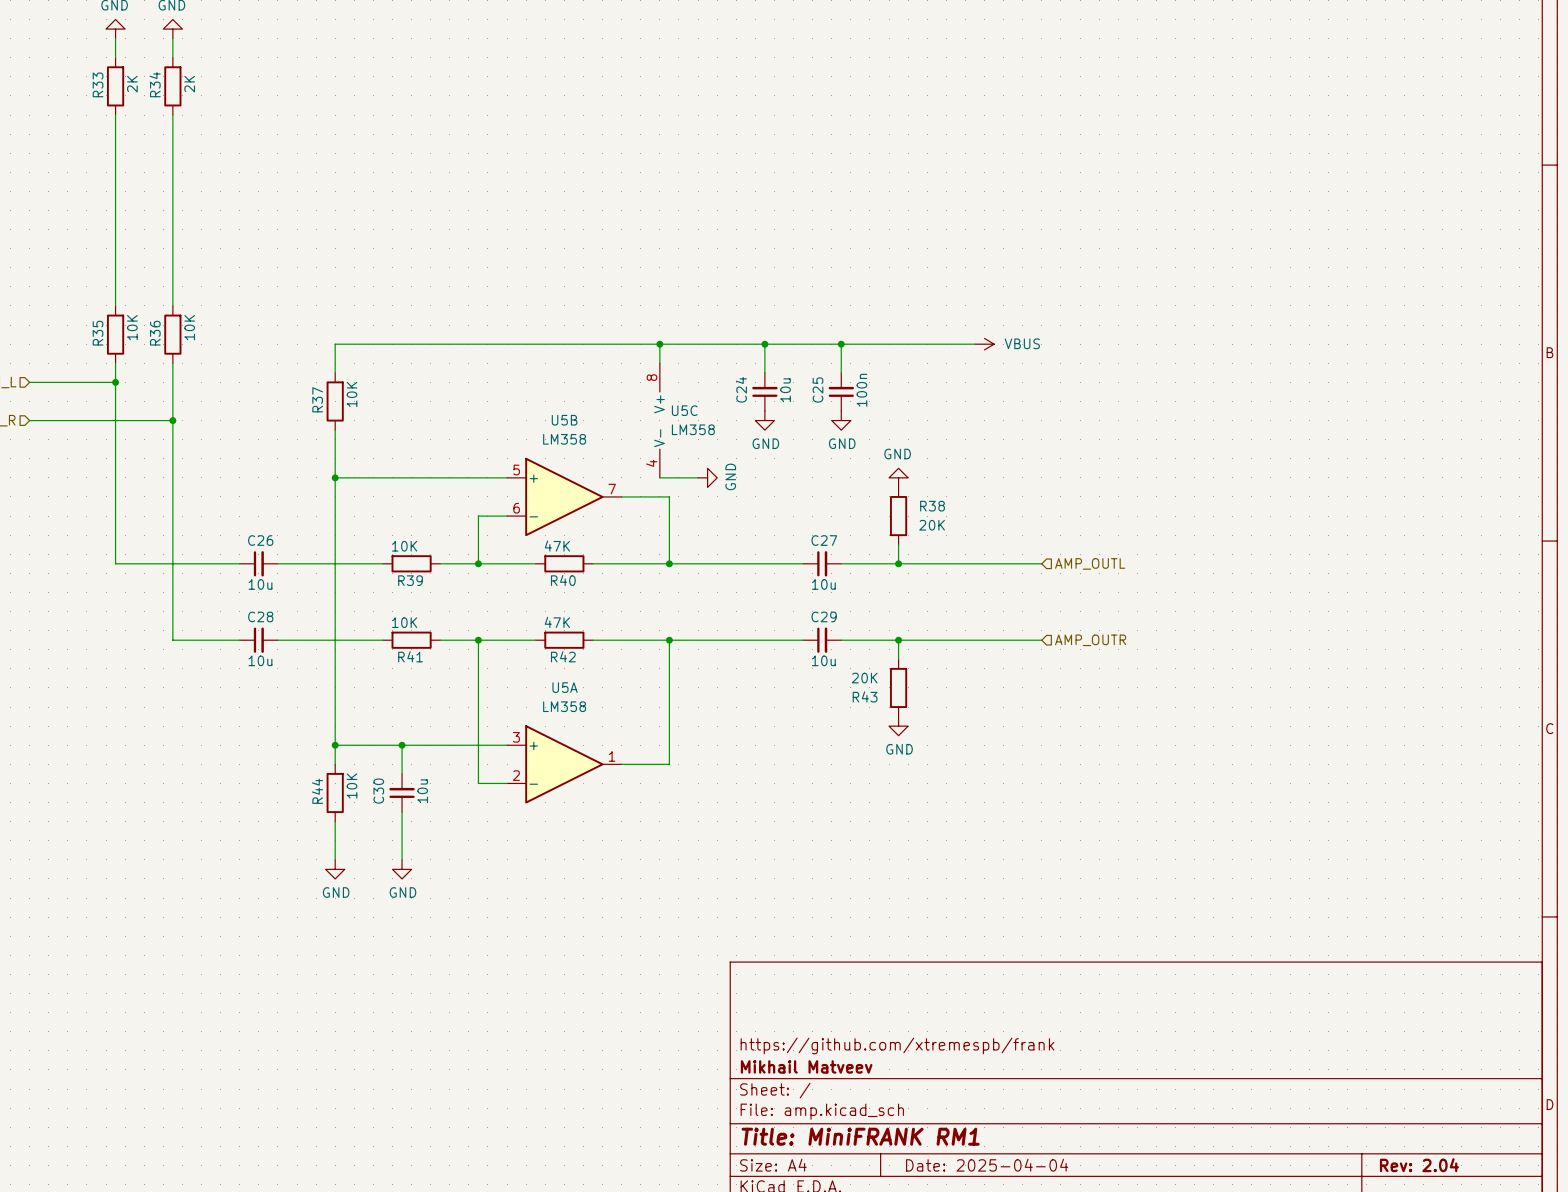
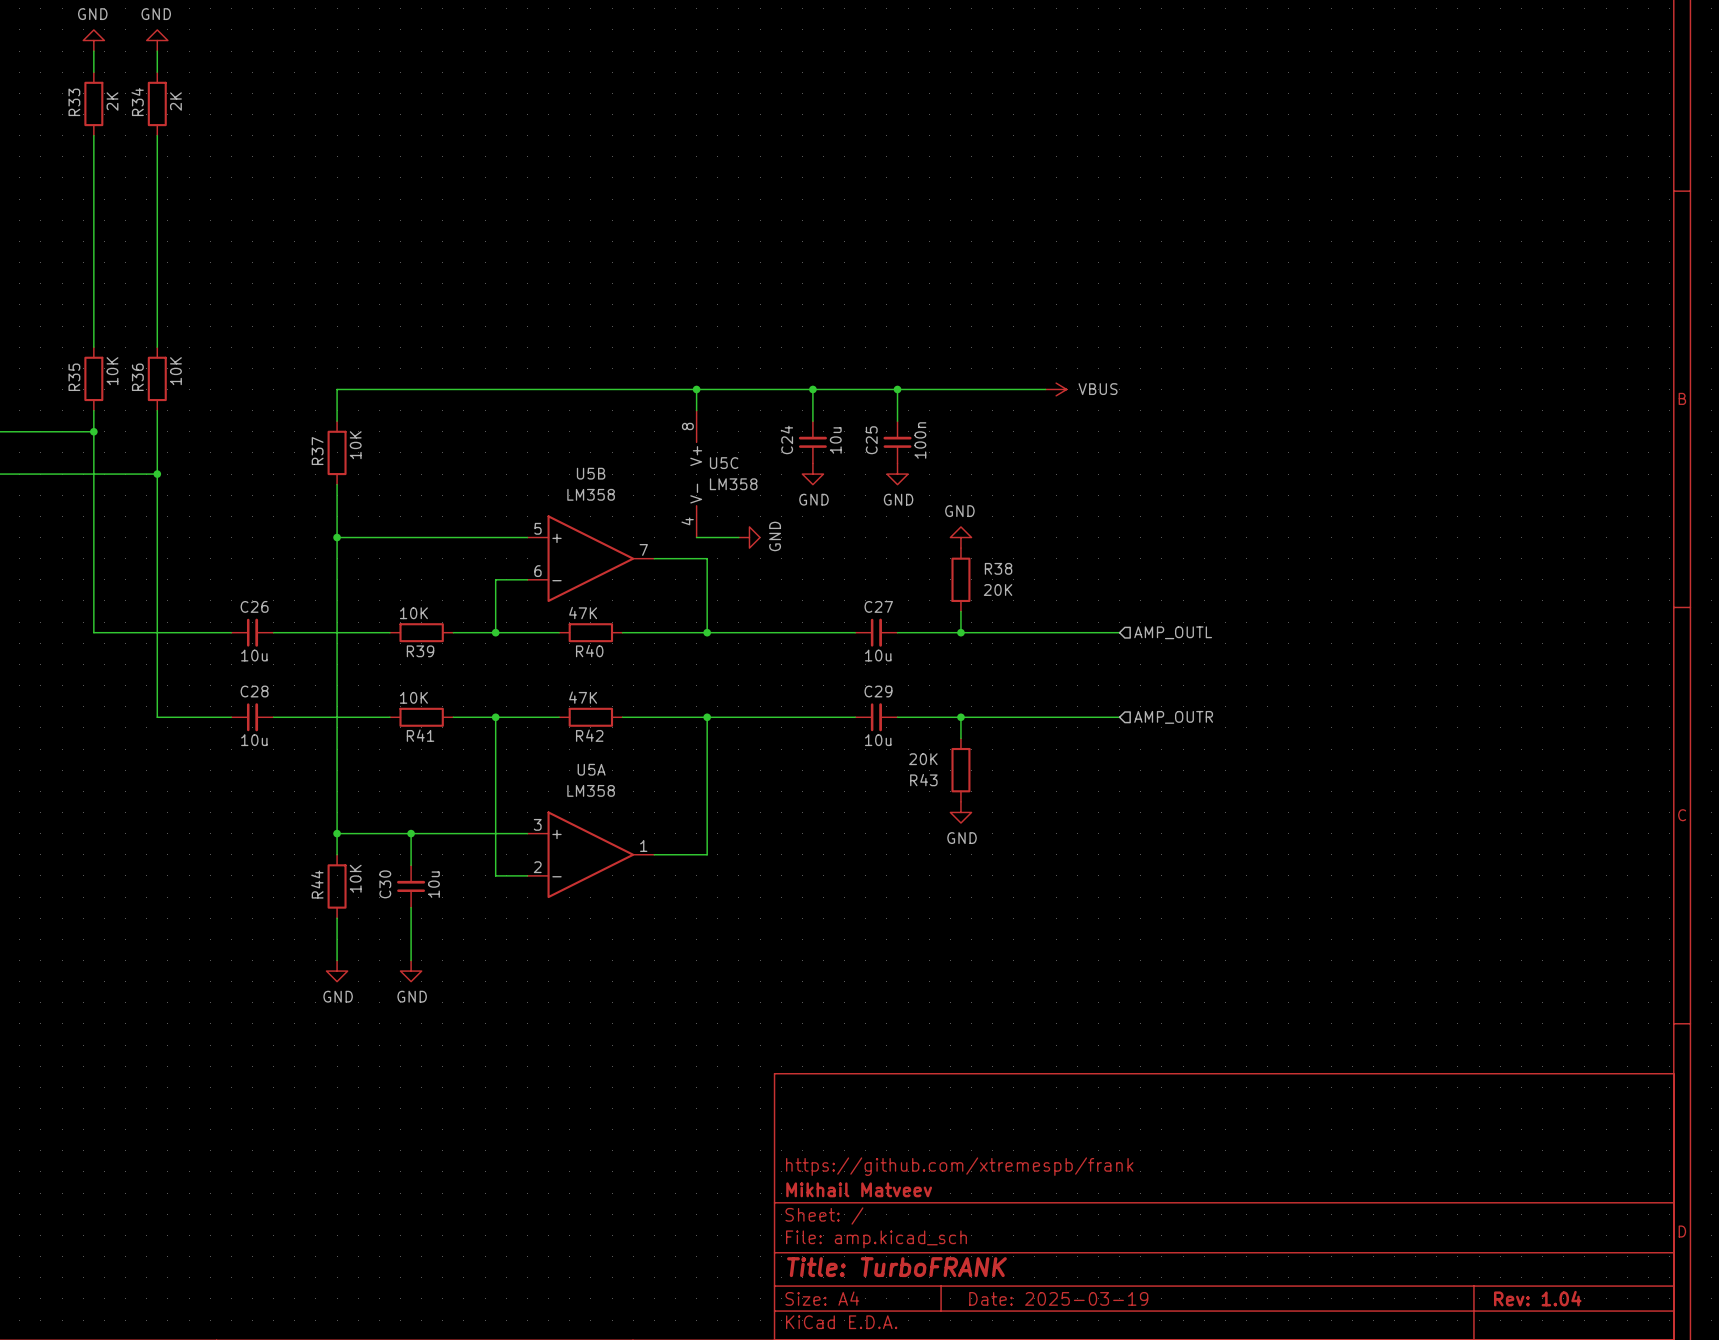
title block: Title: MiniFRANK RM1 (860, 1136) -> Title: TurboFRANK (896, 1267)
title block: Date: 2025-04-04 (987, 1165) -> Date: 2025-03-19 (1058, 1298)
title block: Rev: 2.04 (1419, 1165) -> Rev: 1.04 (1537, 1298)

